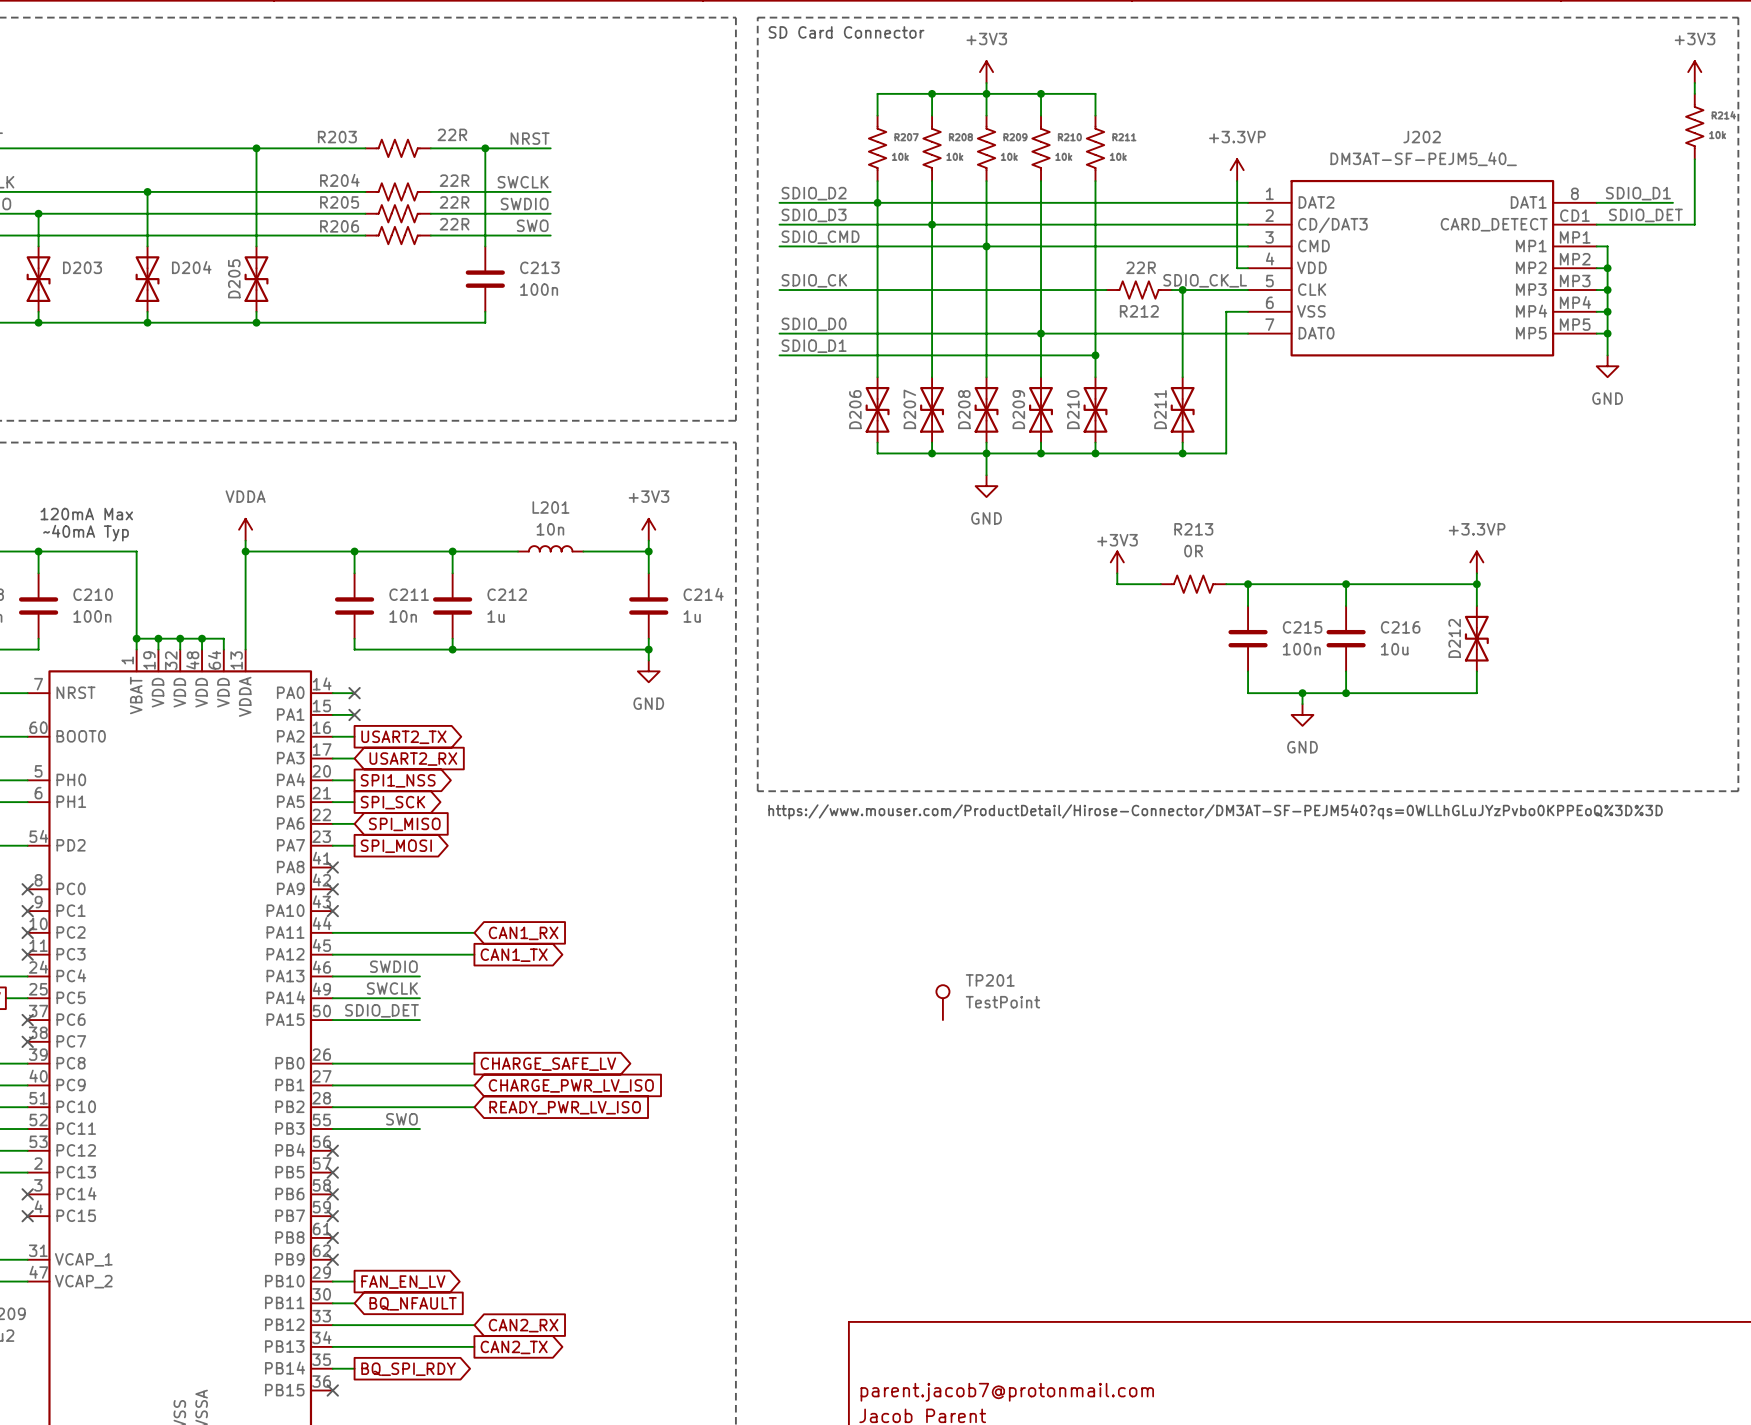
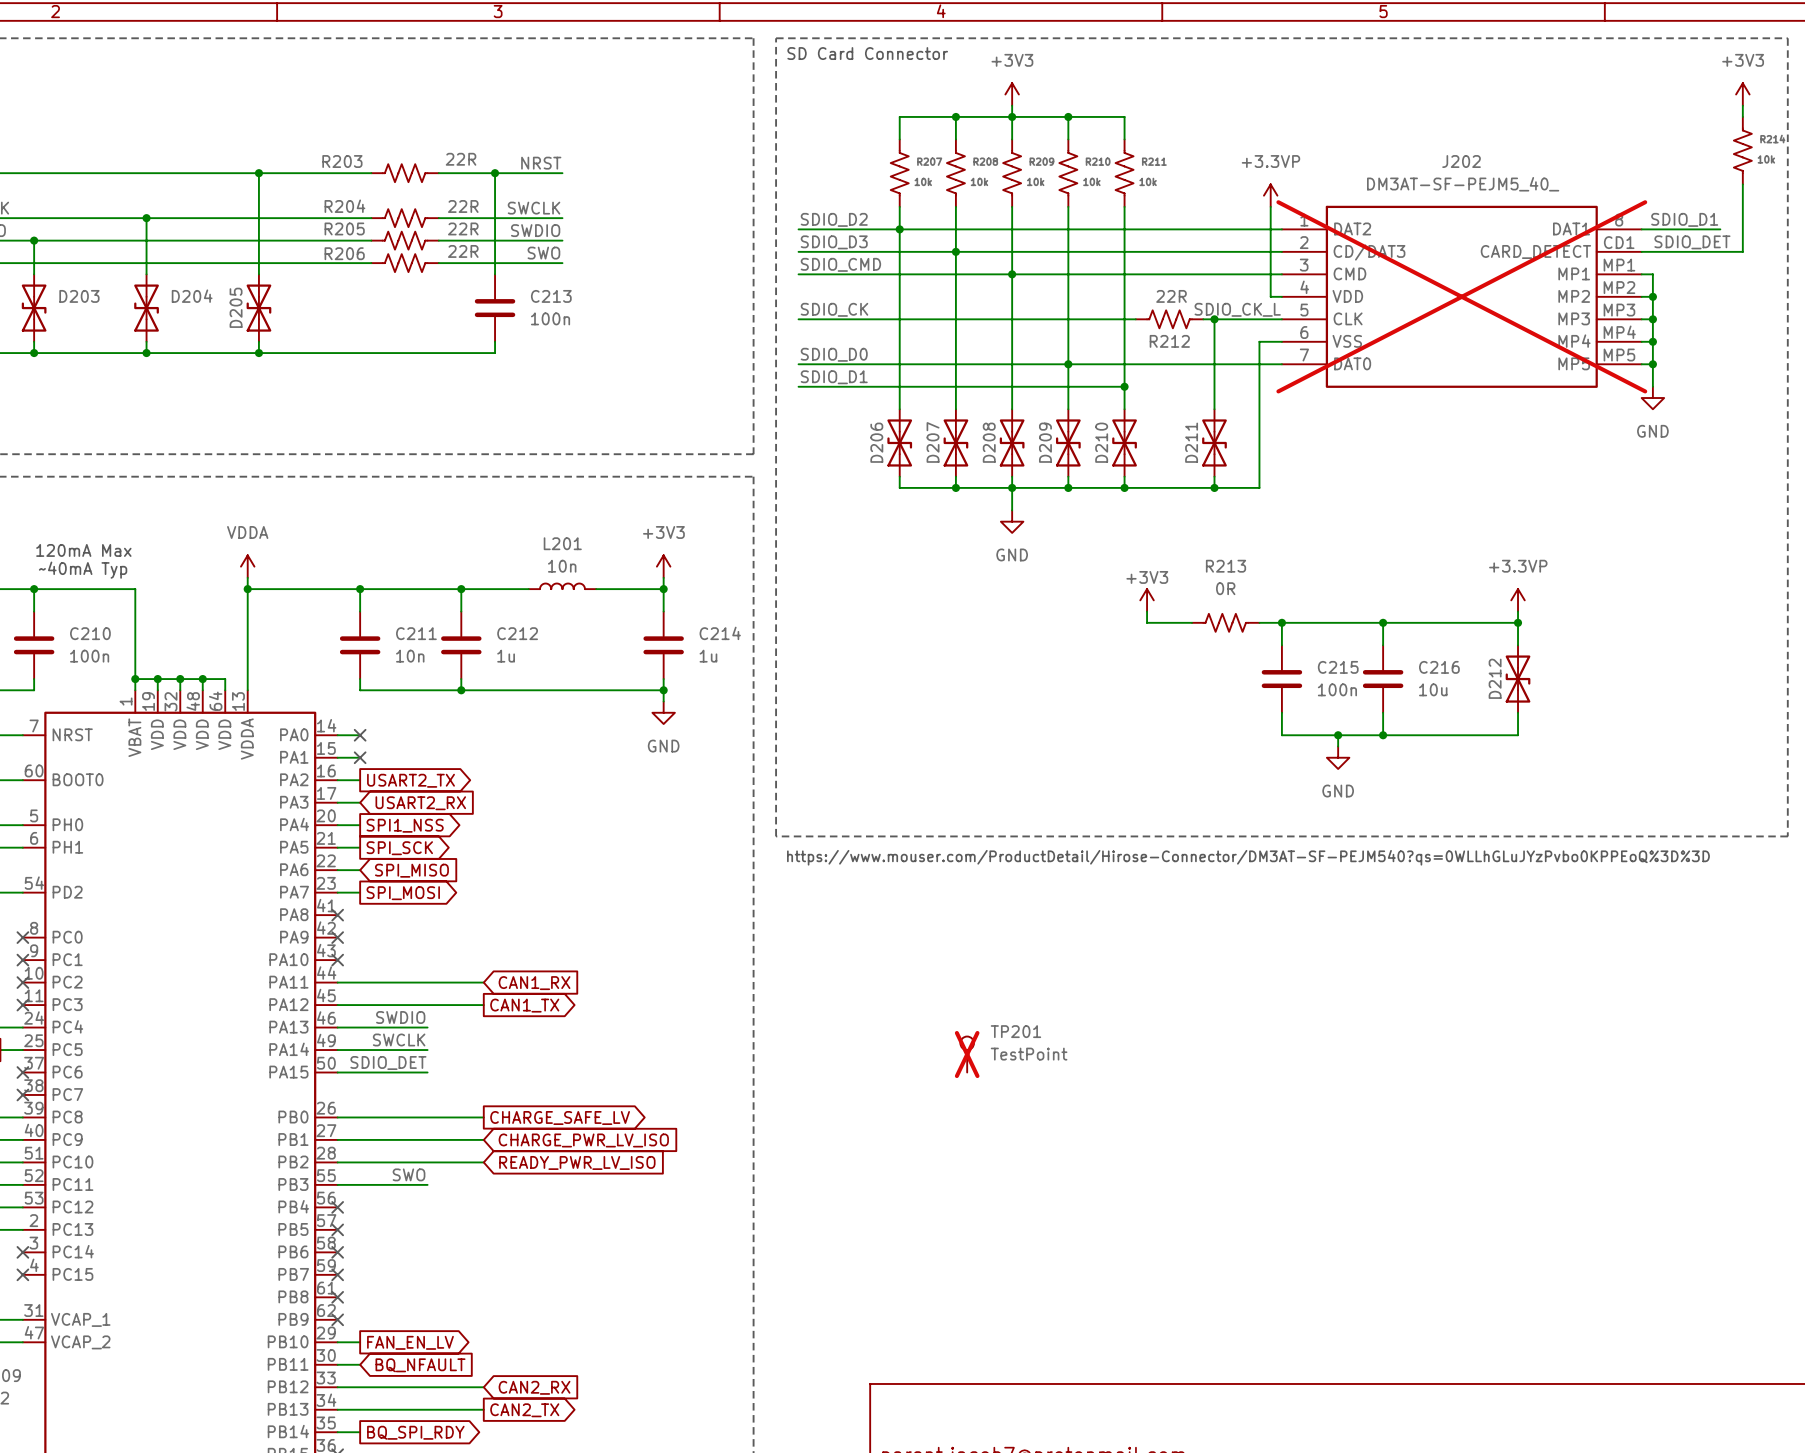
J202 do-not-place cross: none -> (1461, 296)
TP201 do-not-place cross: none -> (967, 1054)

